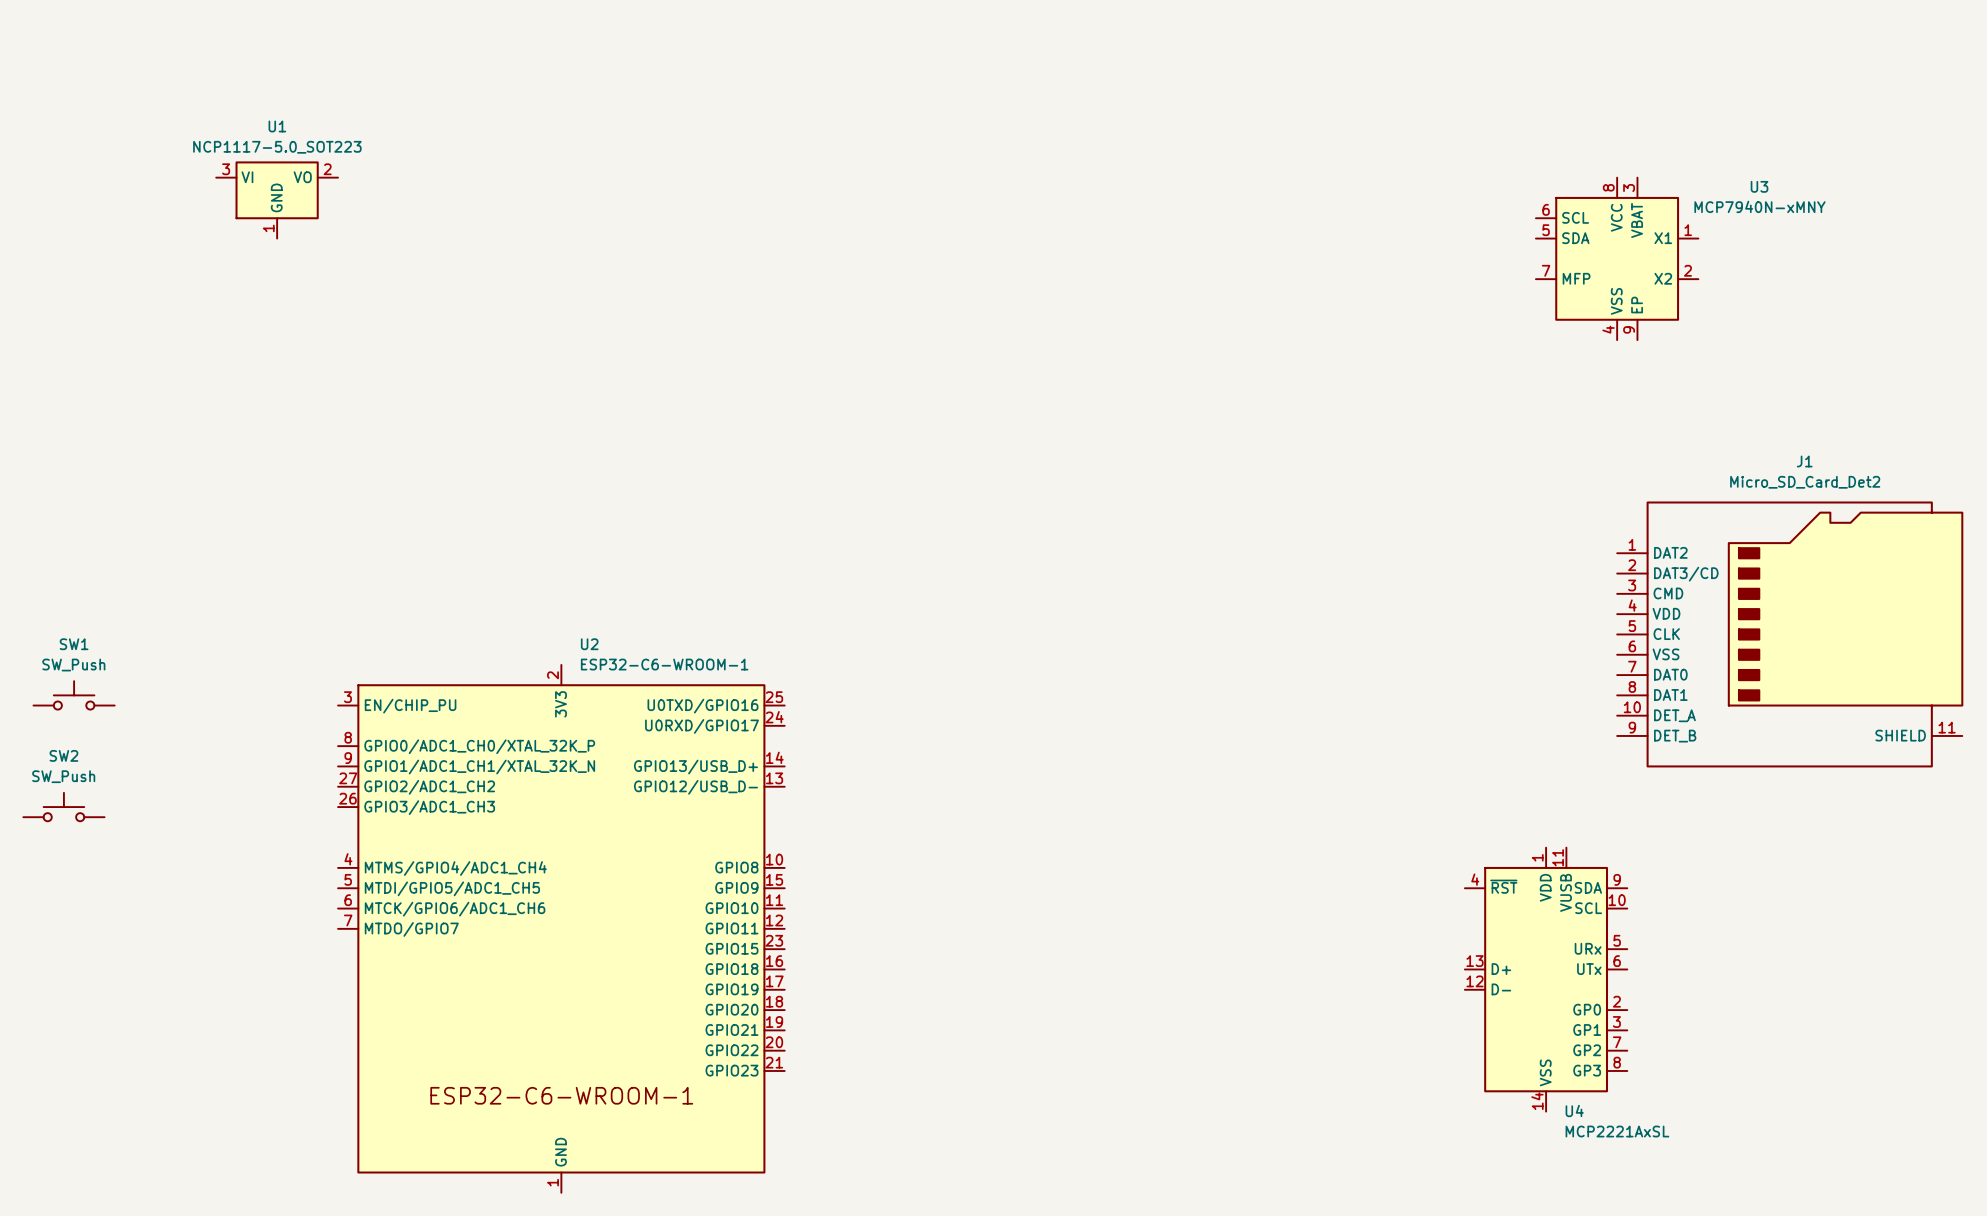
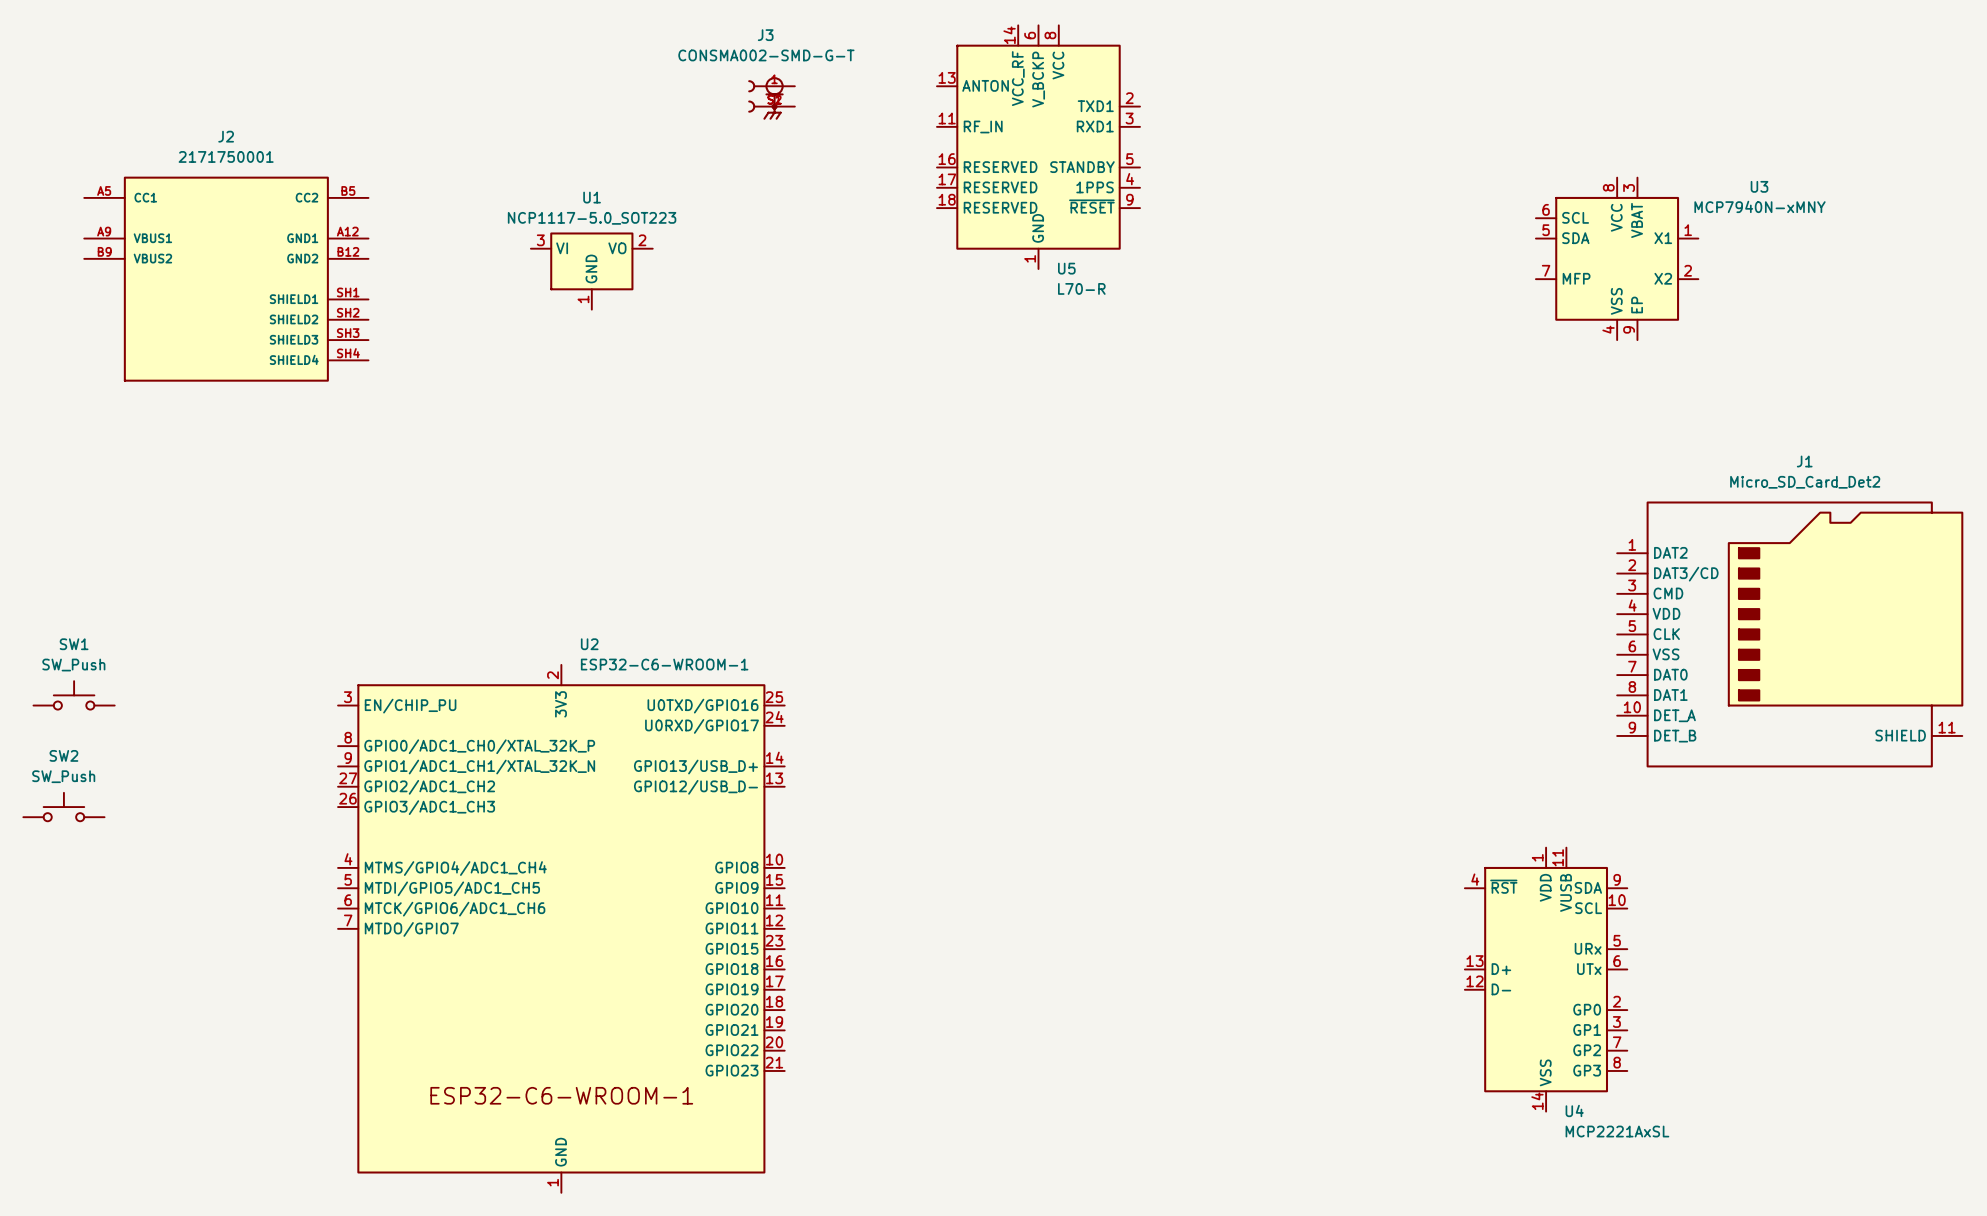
J3: none -> CONSMA002-SMD-G-T (771, 98)
U5: none -> L70-R (1038, 147)
U1 position: (277, 199) -> (591, 271)
J2: none -> 2171750001 (226, 279)

